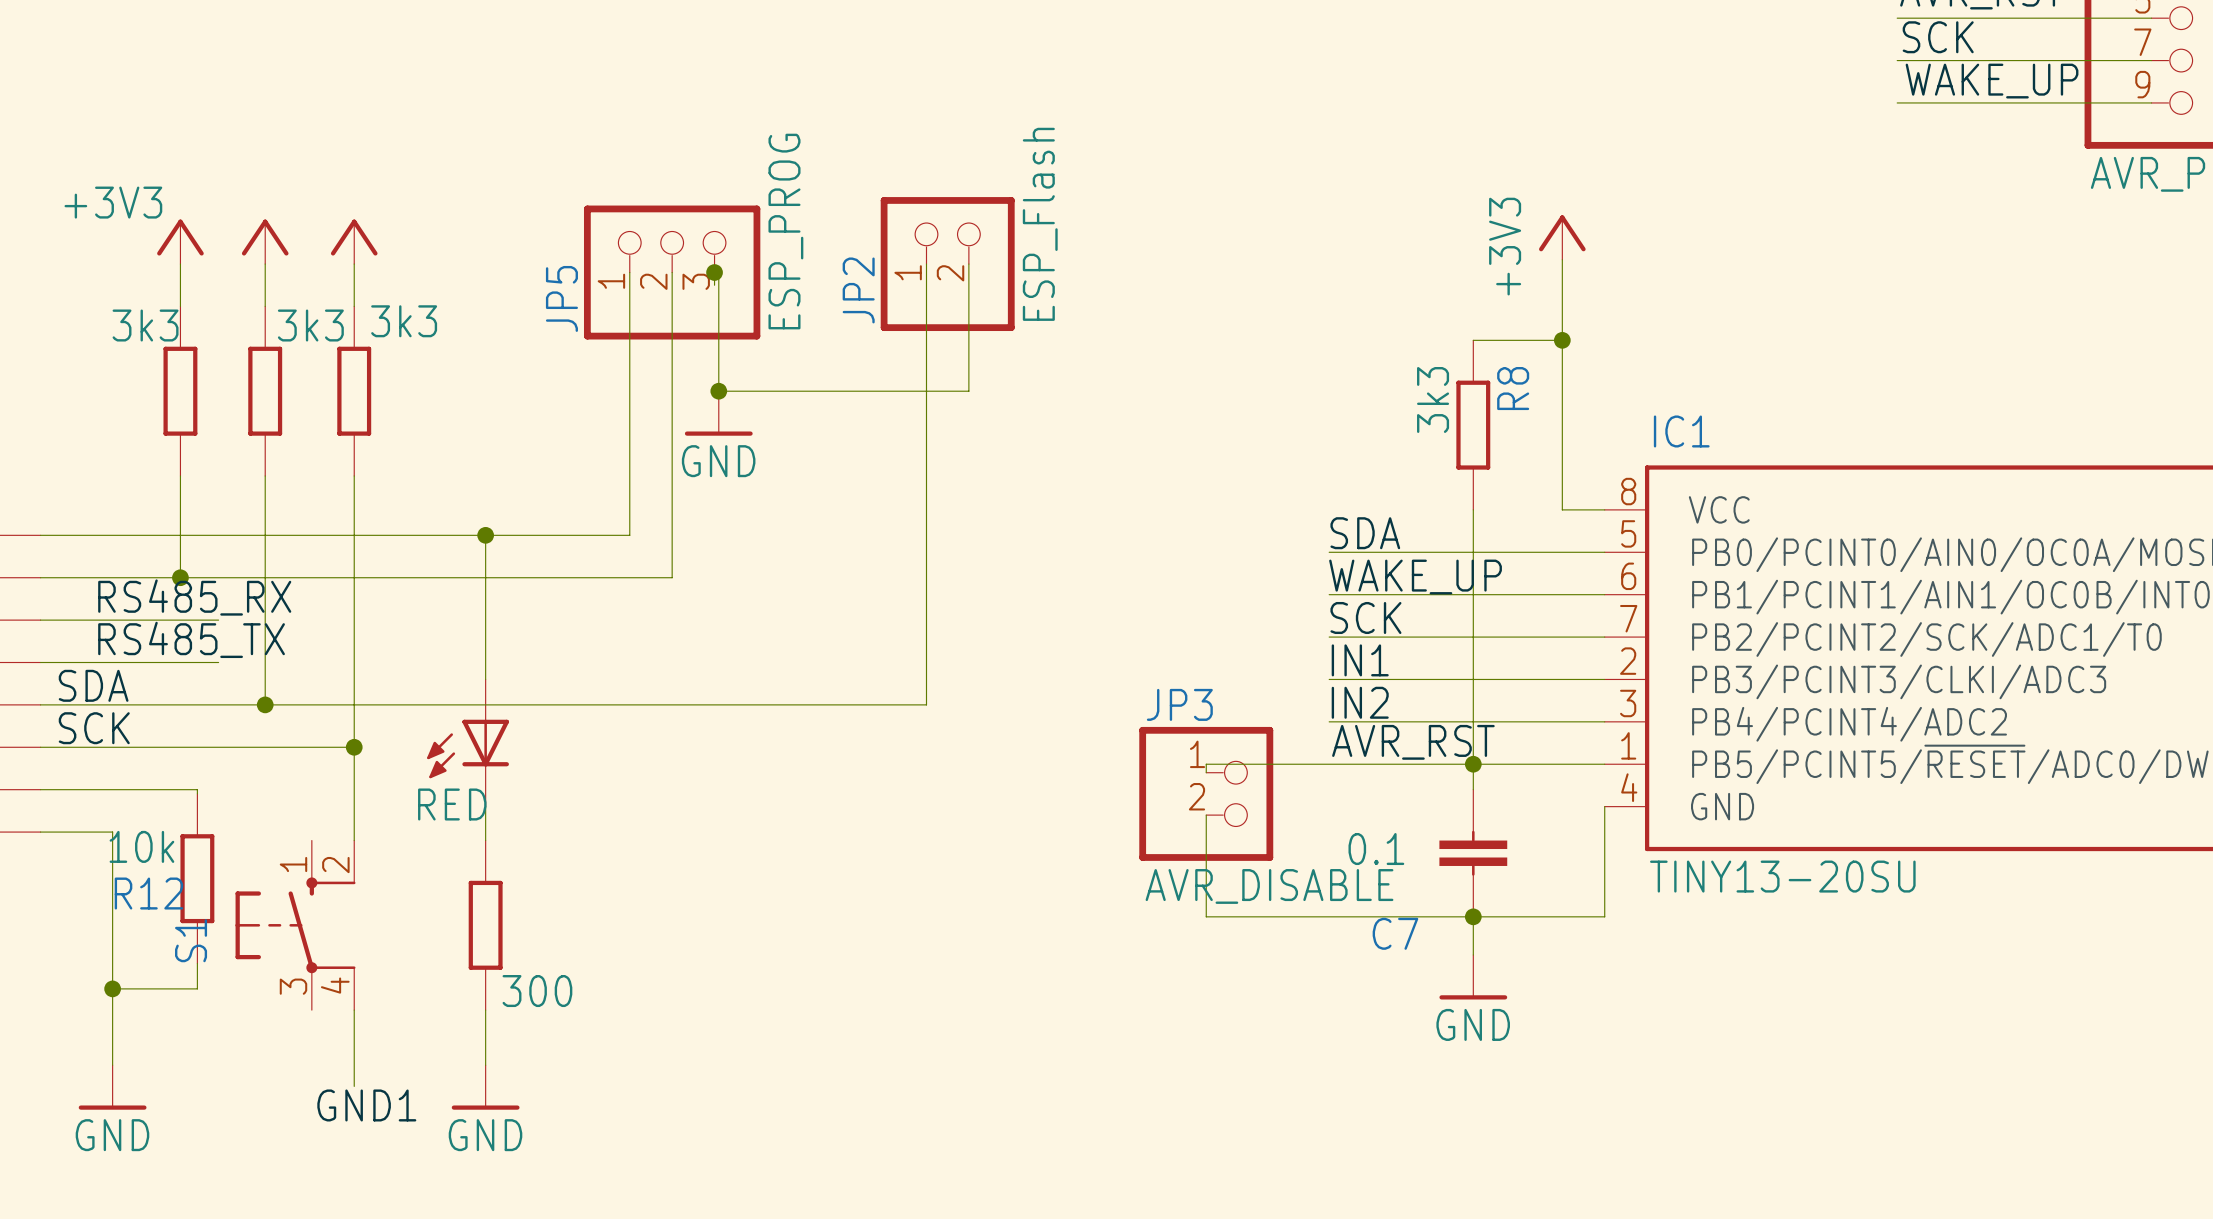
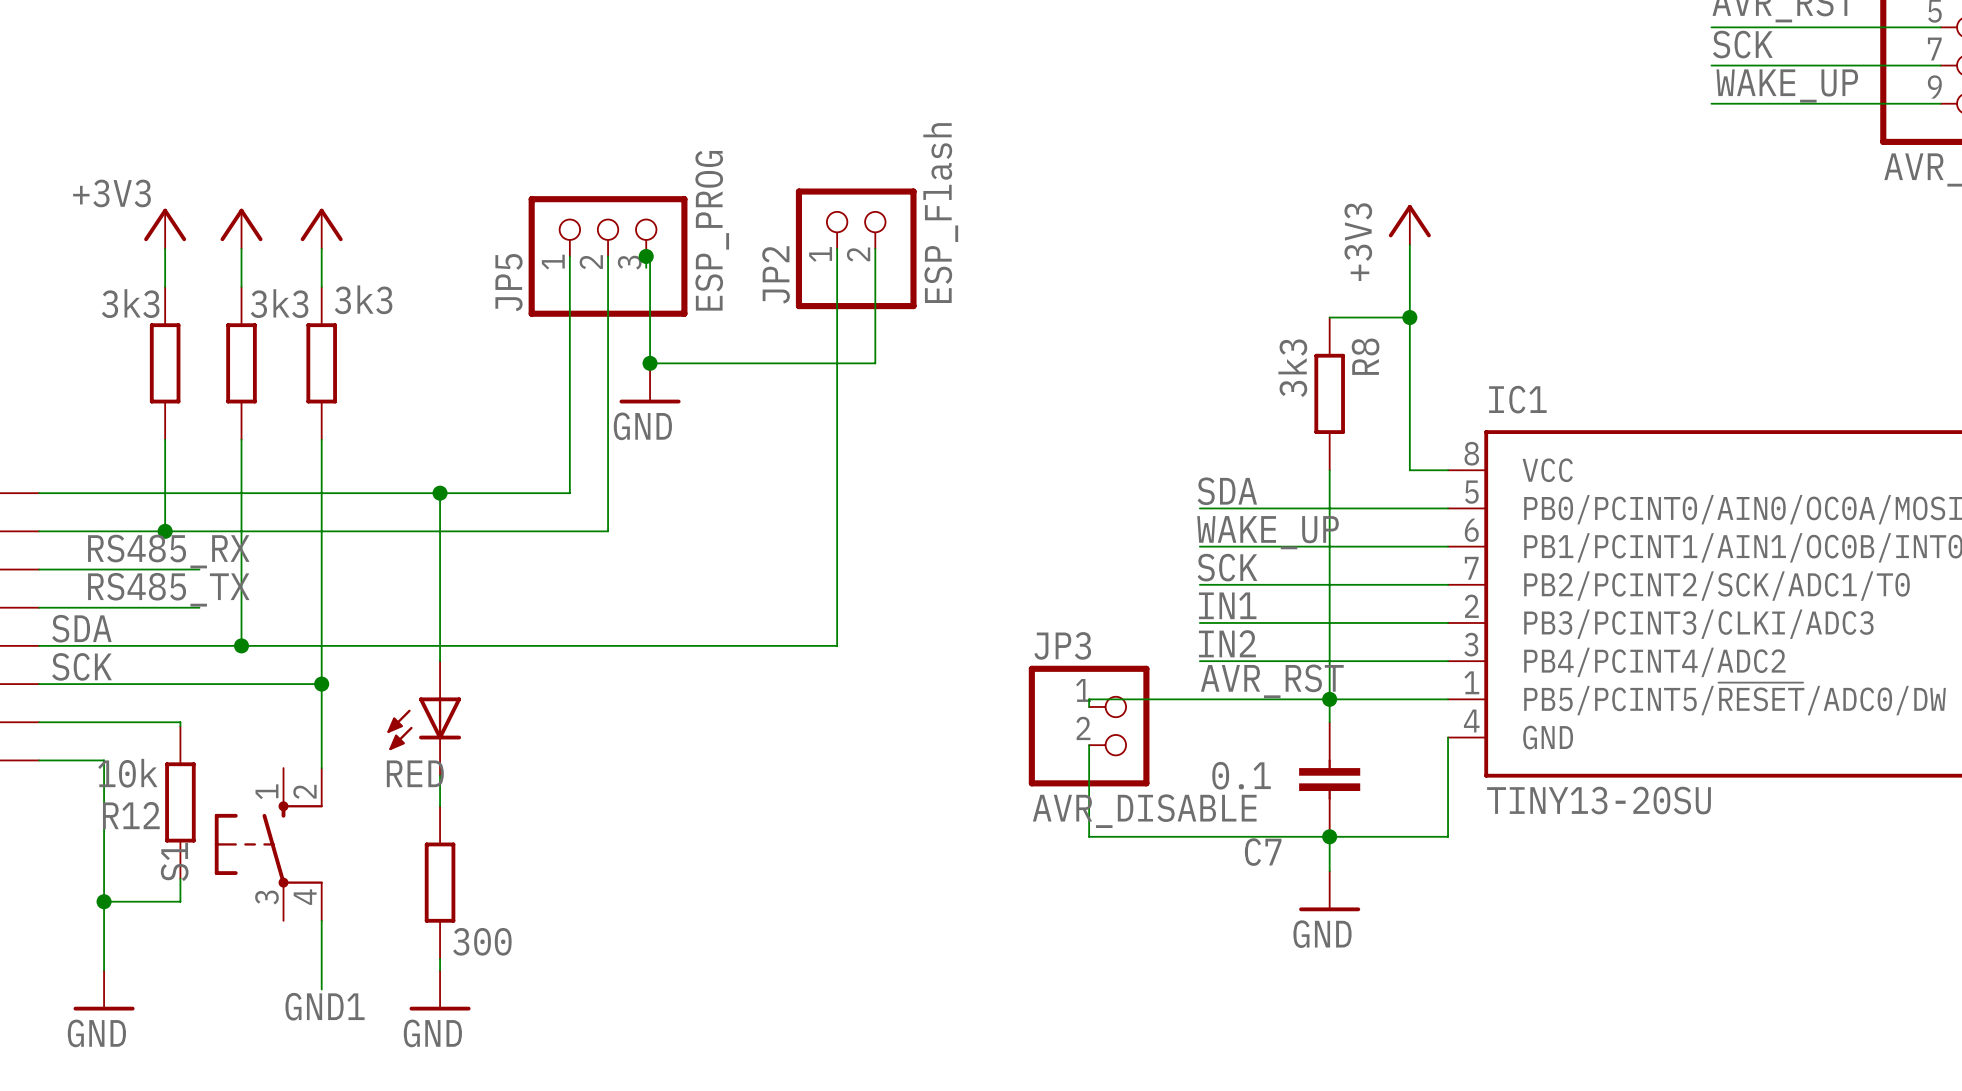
part position: (468, 743) -> (424, 718)
part position: (485, 925) -> (440, 882)

